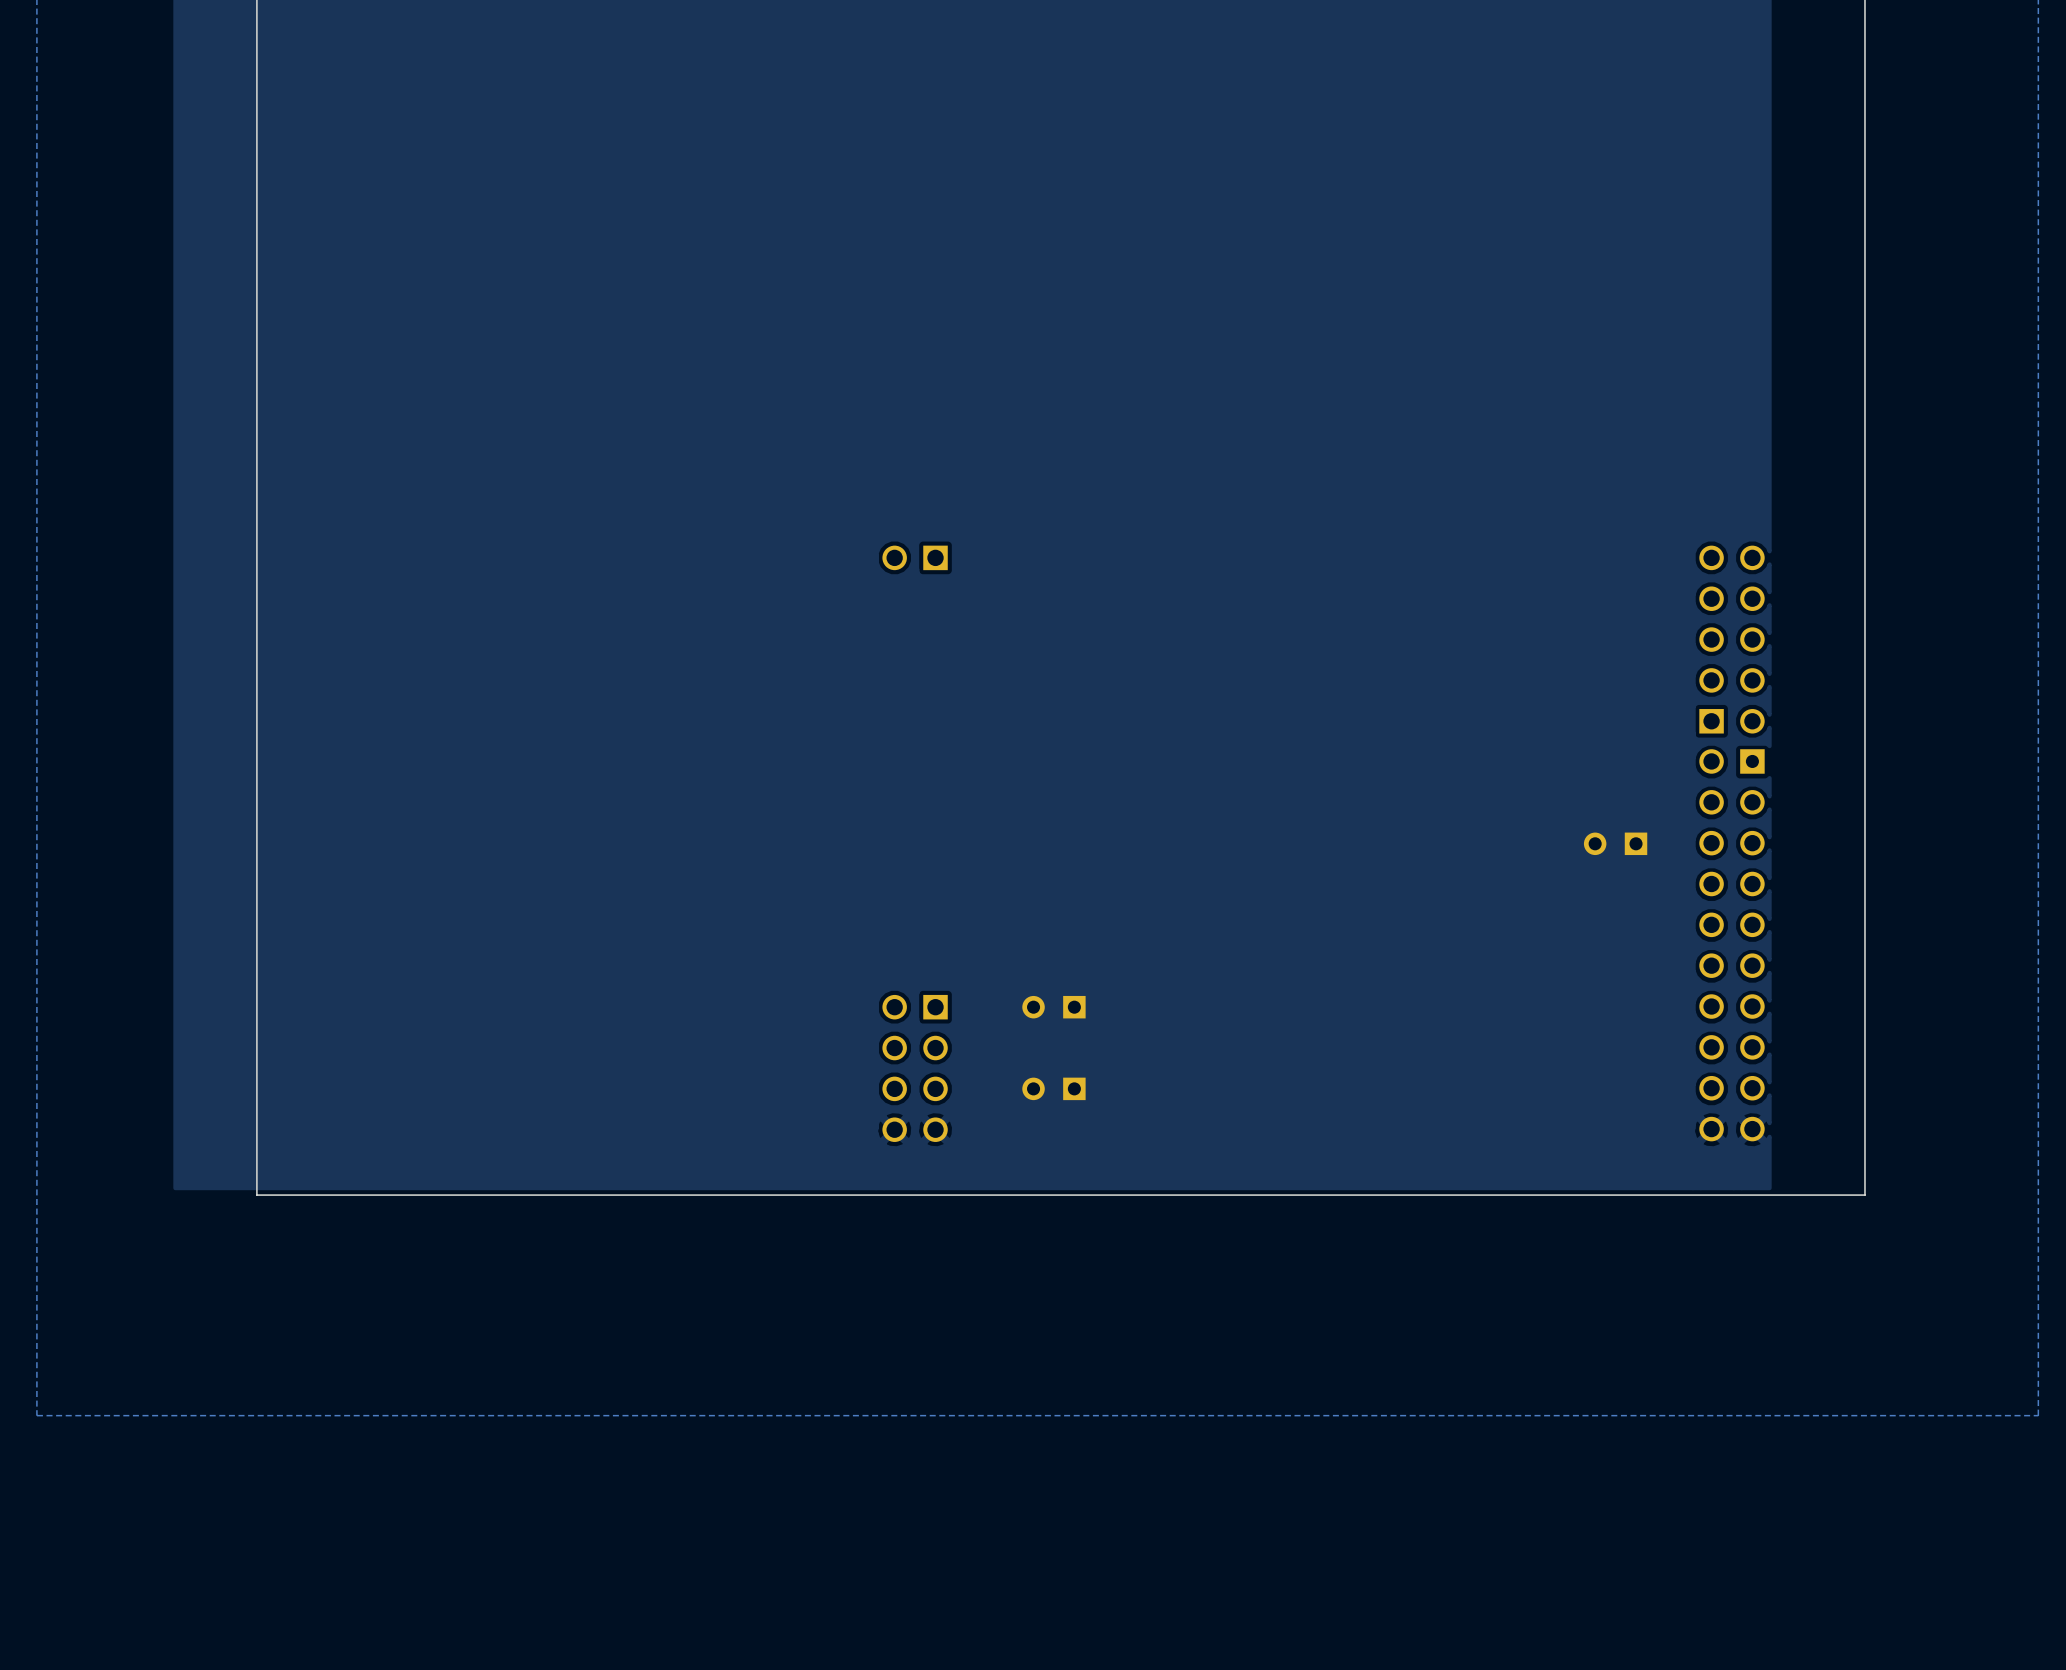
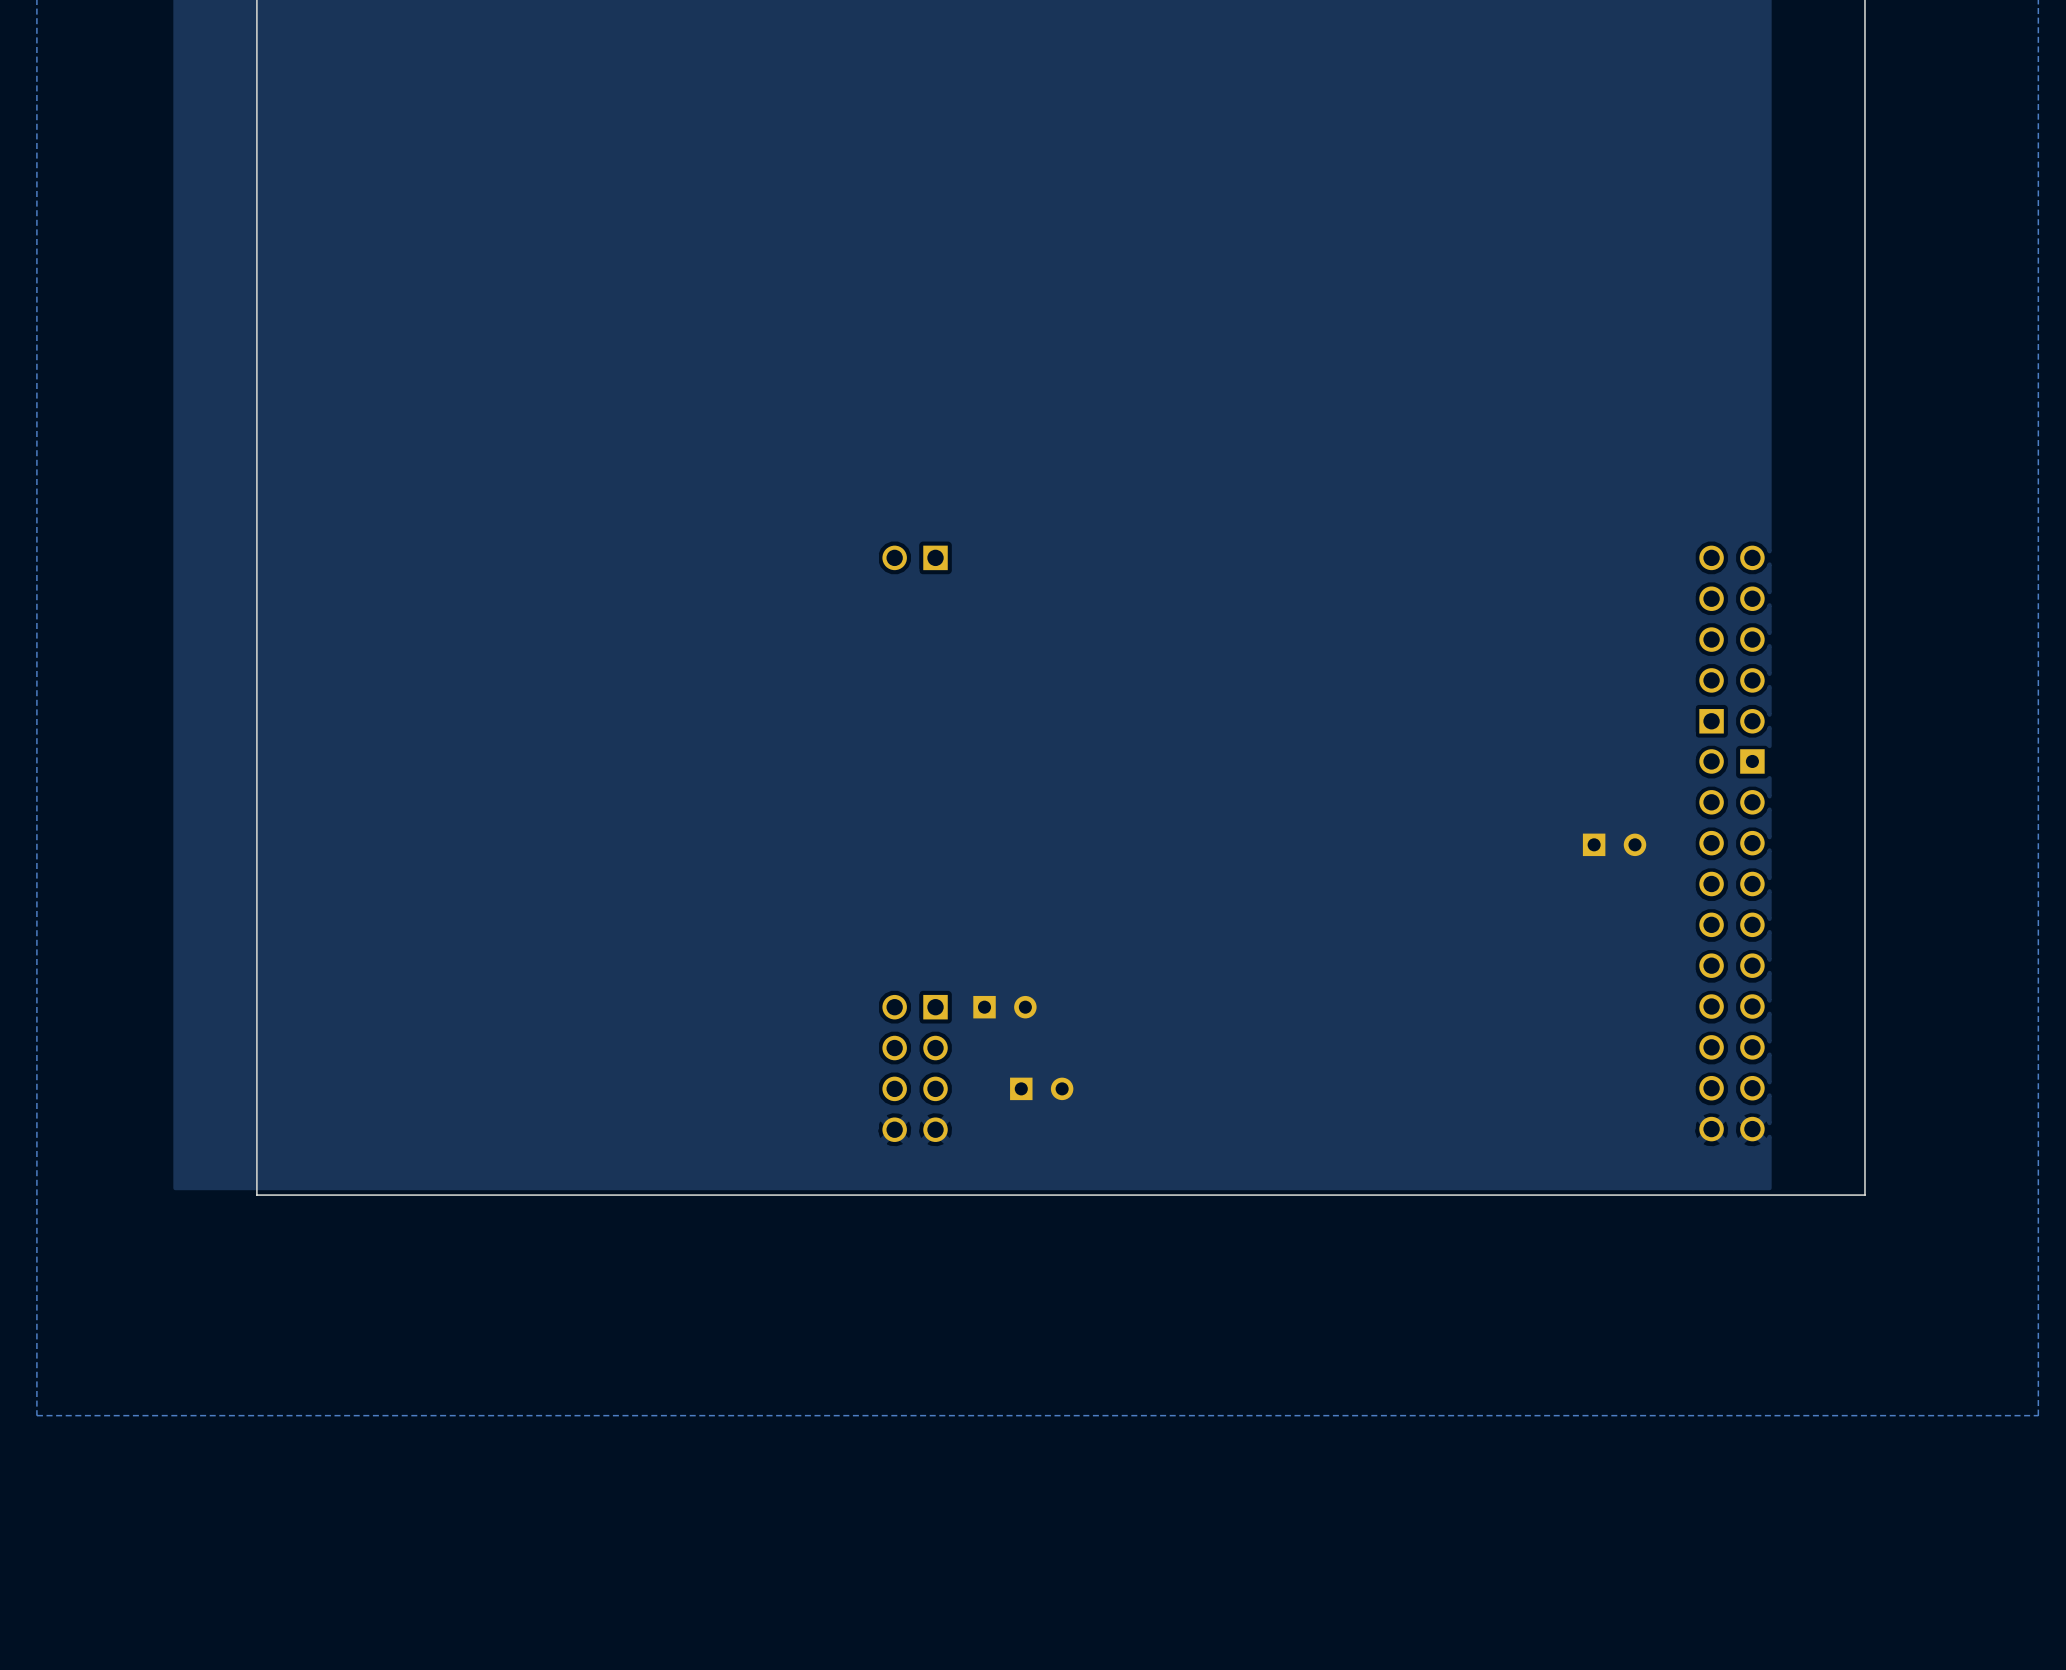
part rotation: 0° (1615, 843) -> 180° (1614, 844)
part rotation: 0° (1053, 1007) -> 180° (1004, 1007)
part position: (1053, 1007) -> (1004, 1007)
part rotation: 0° (1053, 1088) -> 180° (1041, 1088)

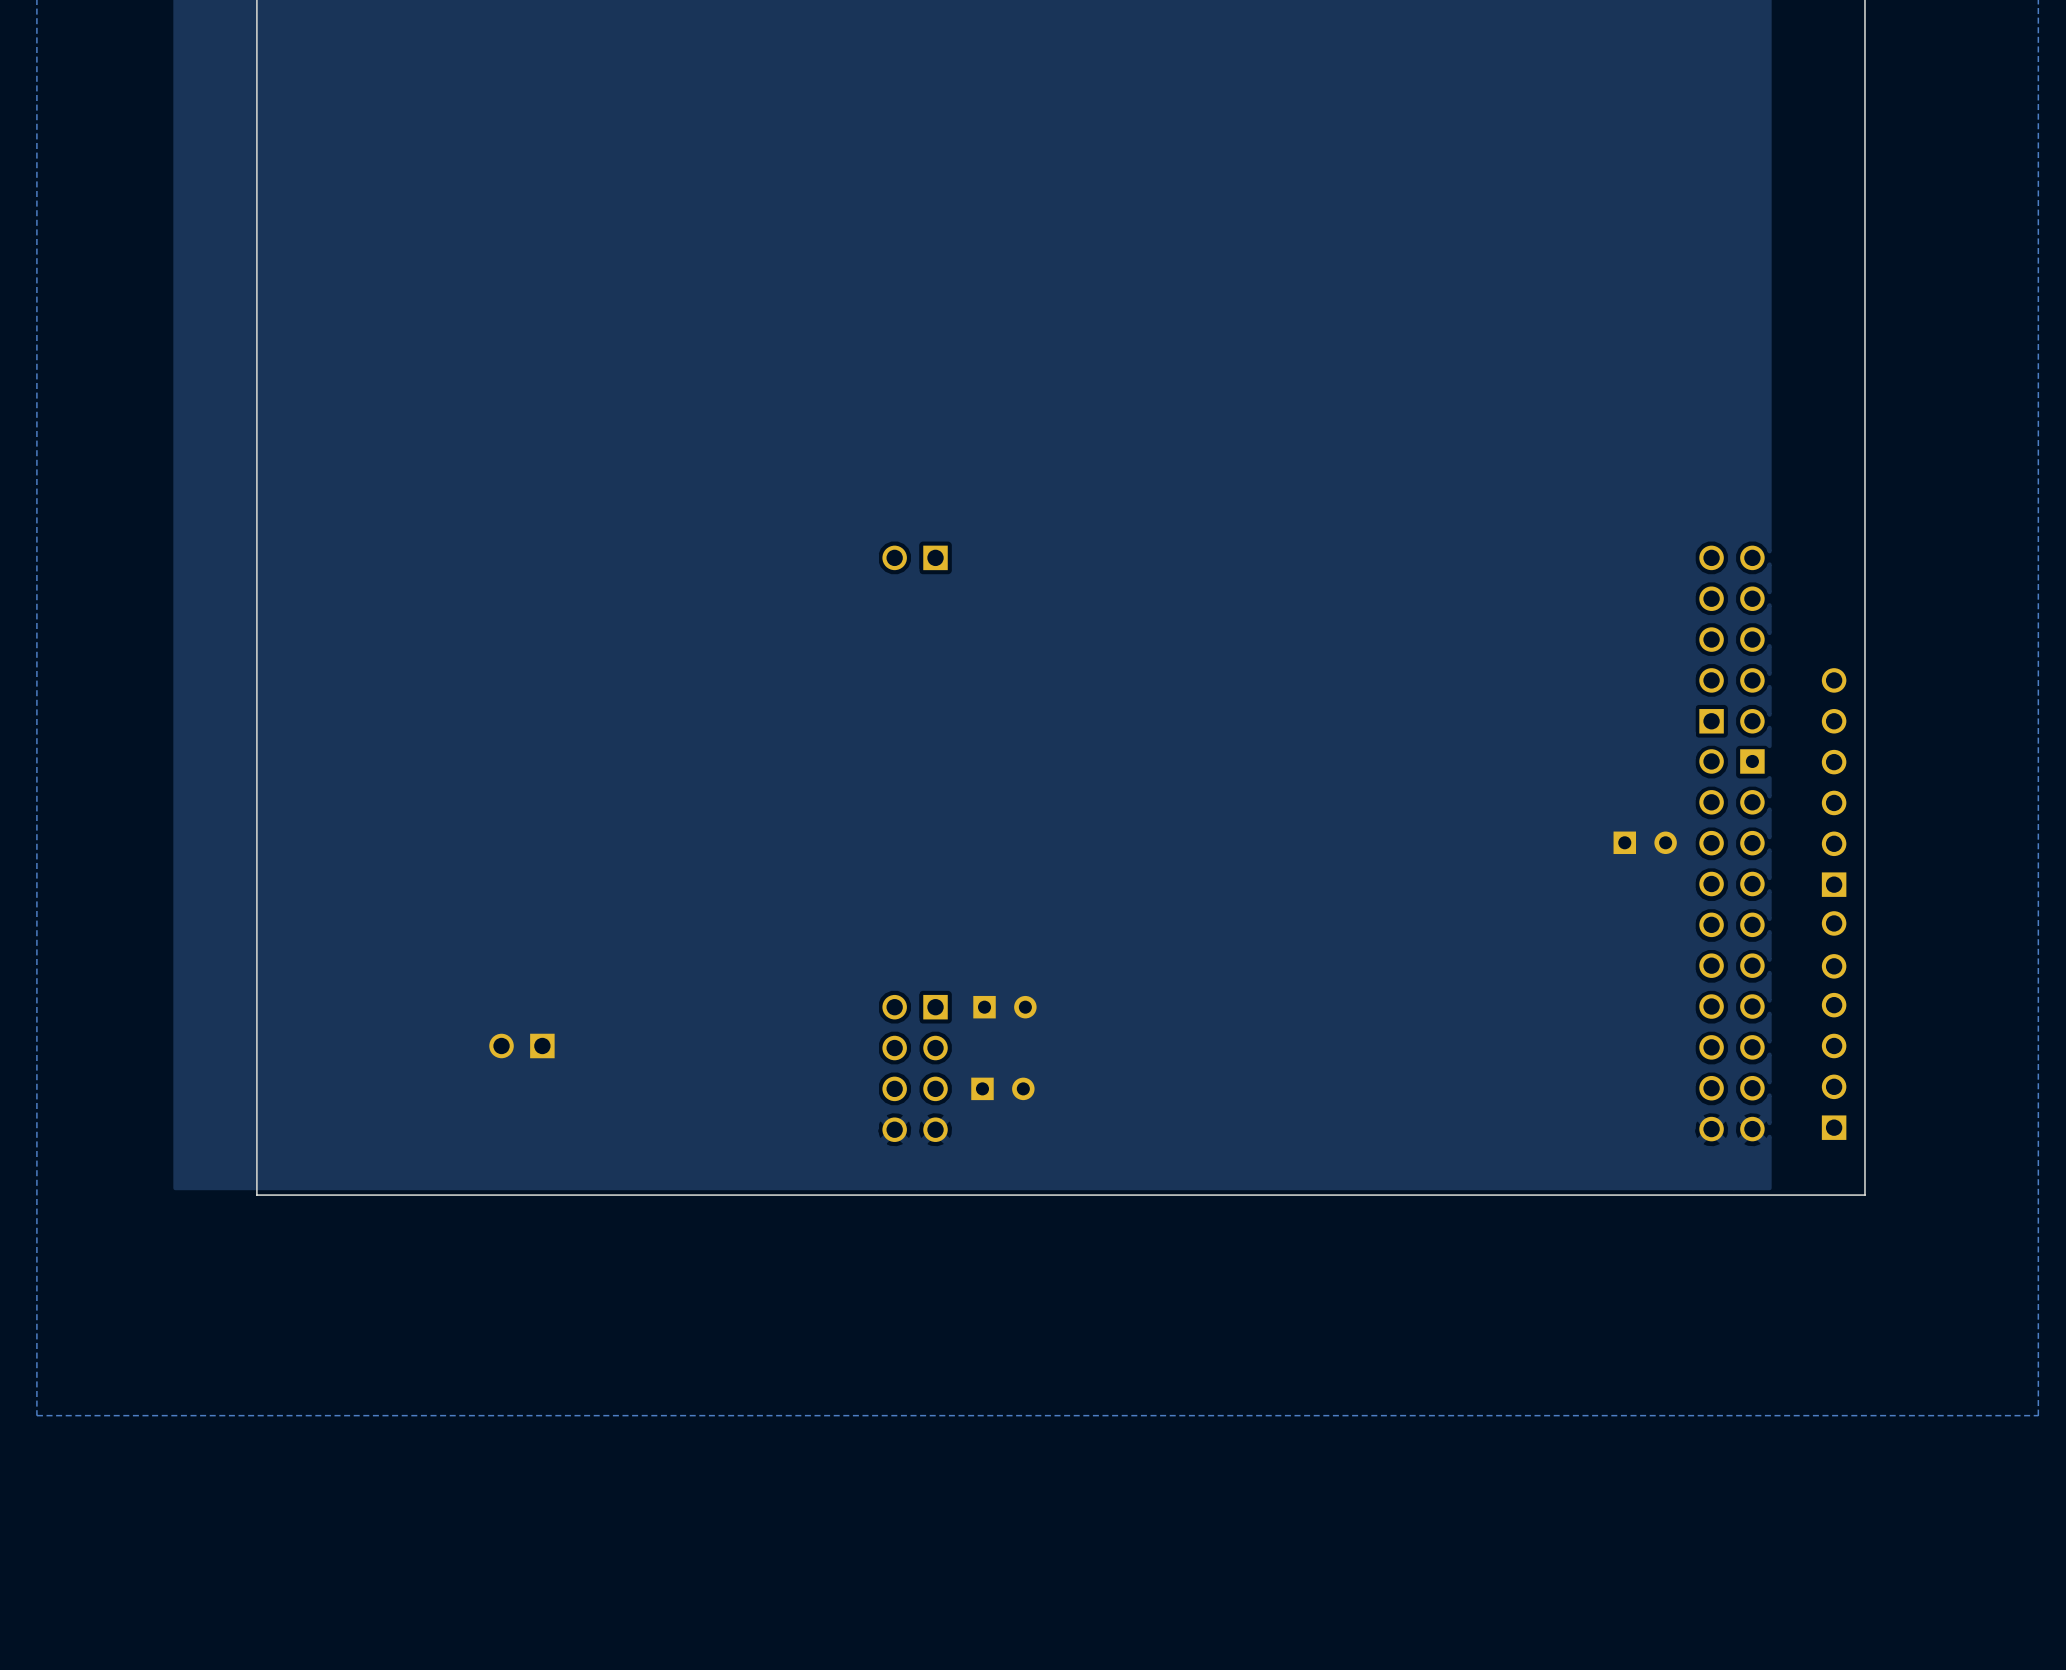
part: none -> (1834, 782)
part position: (1614, 844) -> (1645, 842)
part: none -> (1834, 1025)
part: none -> (521, 1045)
part position: (1041, 1088) -> (1002, 1088)

